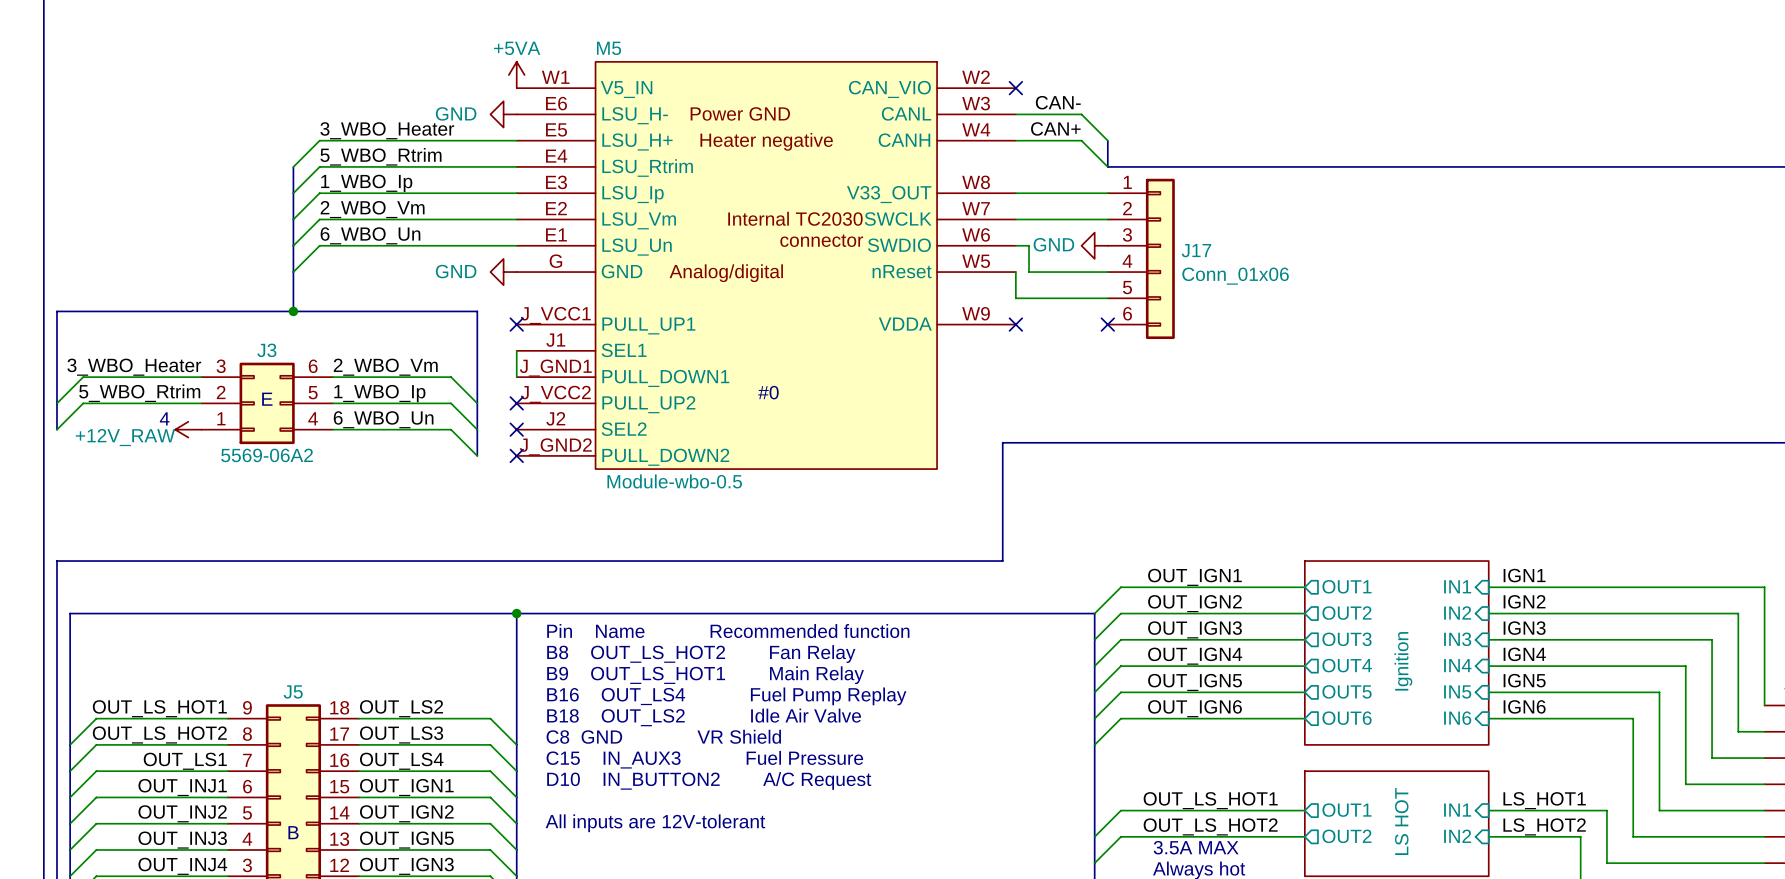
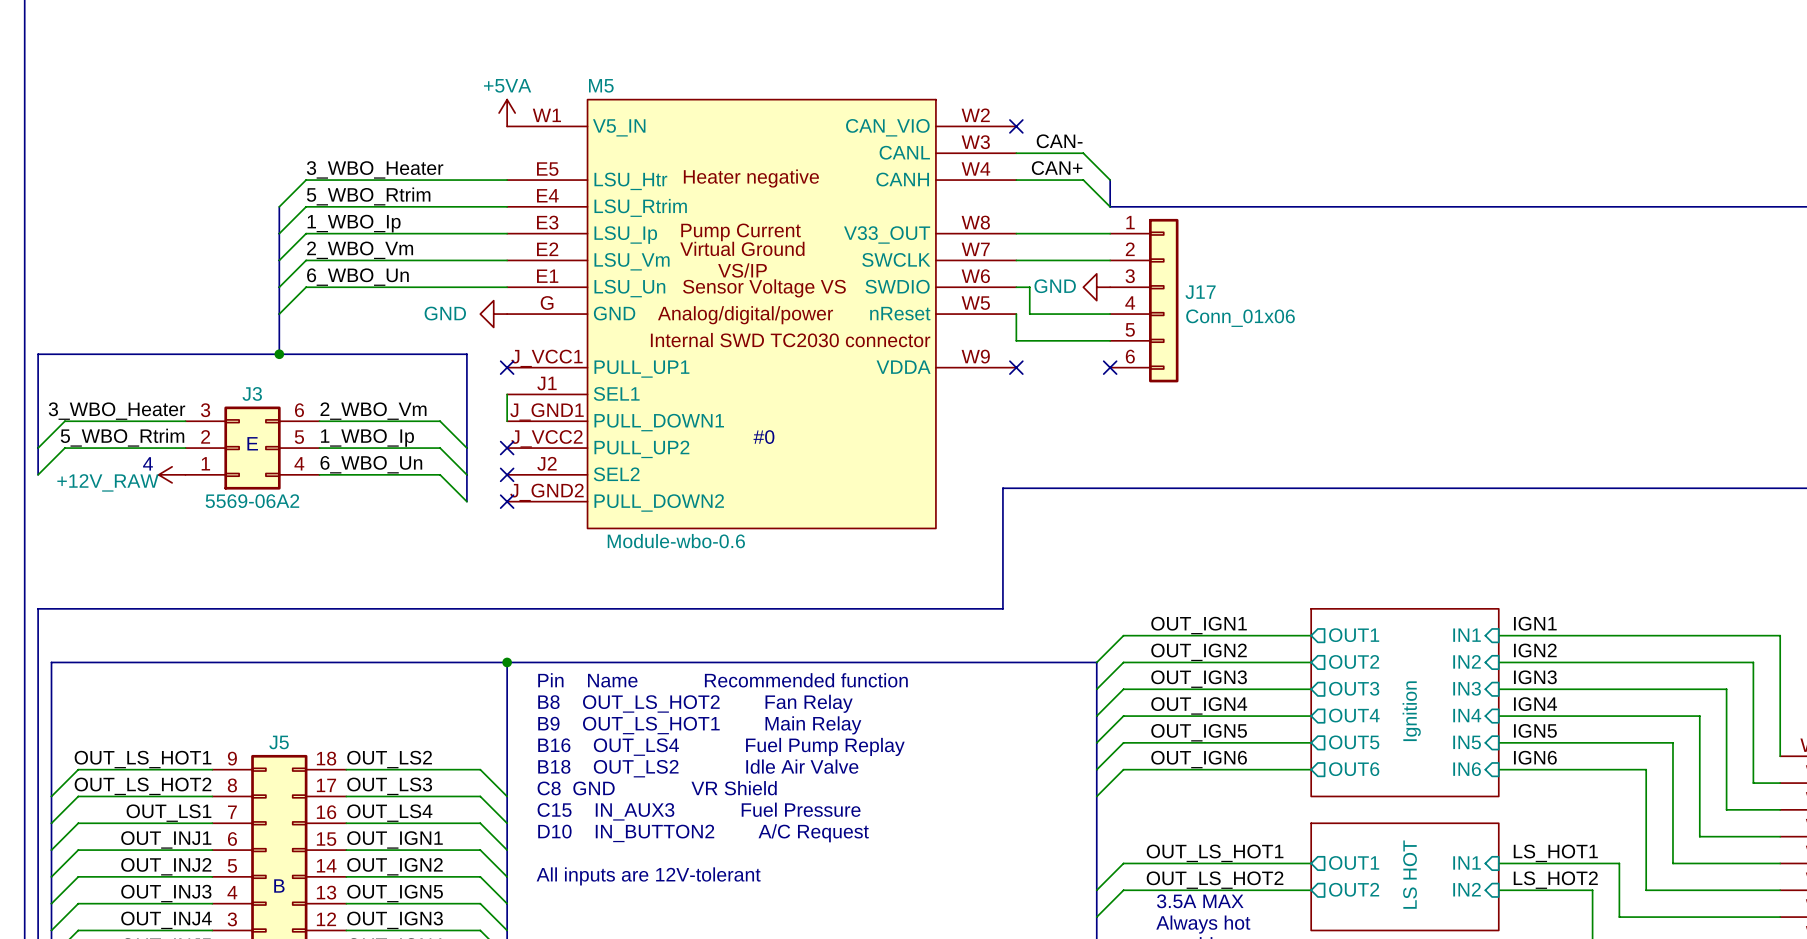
M5 symbol: [516, 61, 1016, 470] -> [507, 99, 1017, 529]
power symbol: GND (503, 114) -> none
M5 value: Module-wbo-0.5 (674, 481) -> Module-wbo-0.6 (676, 541)

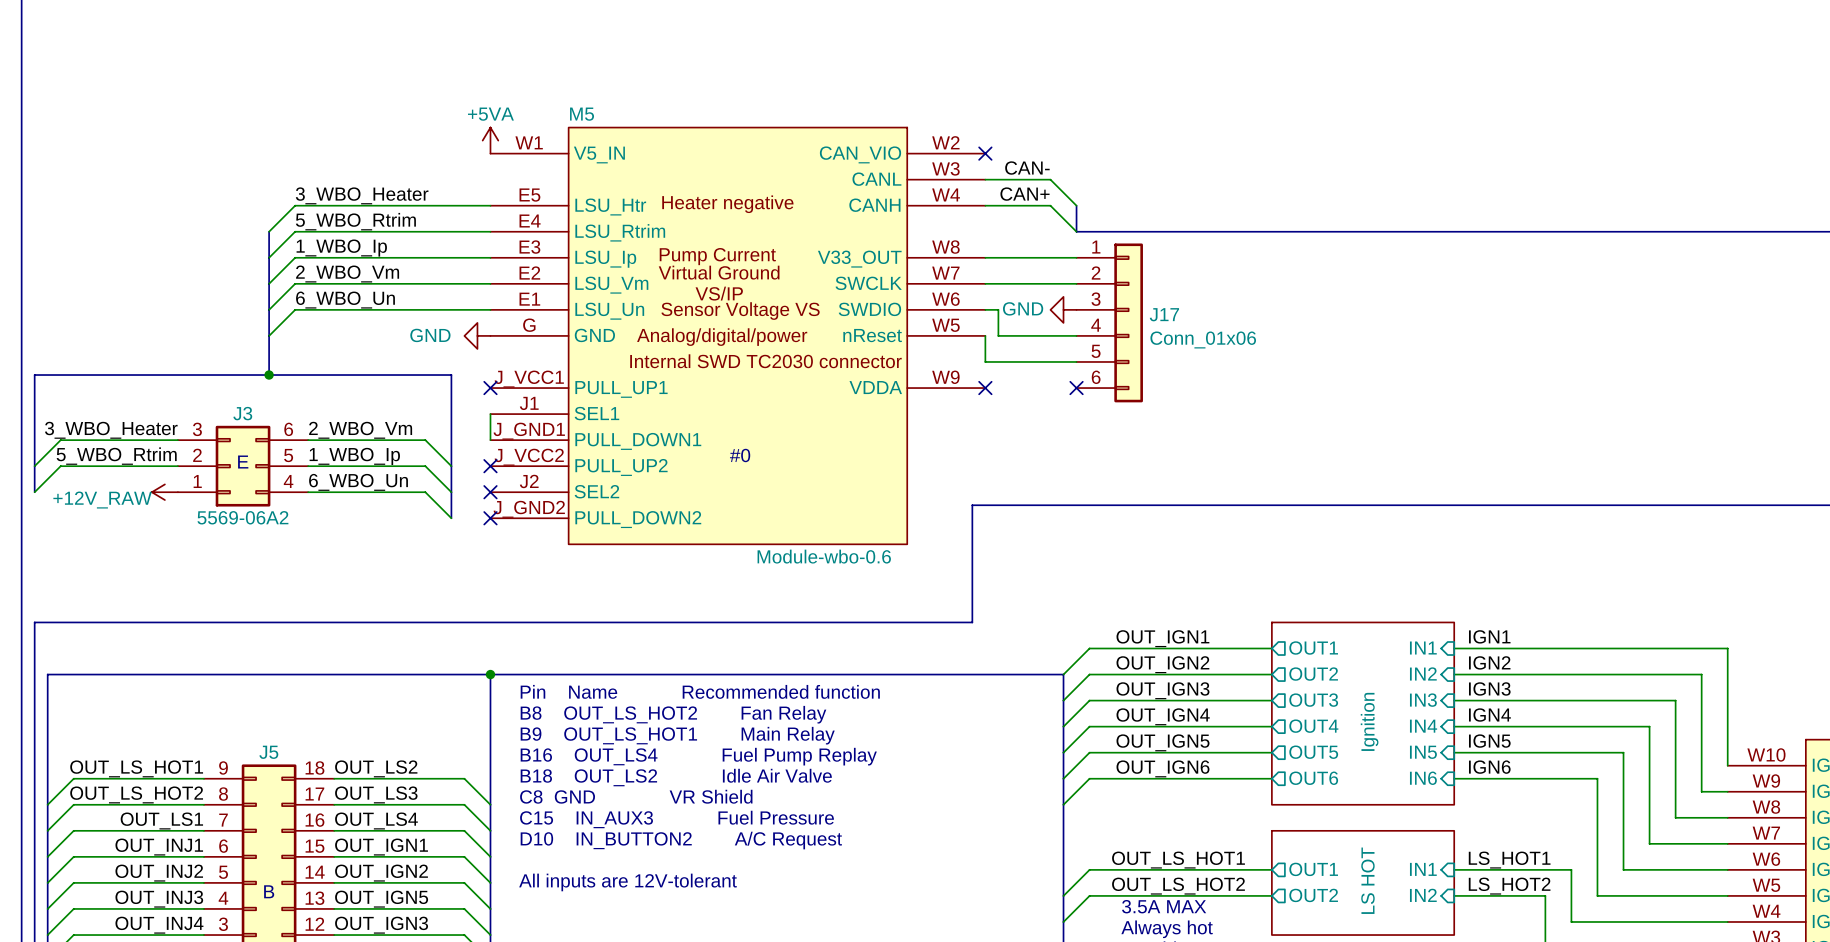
text: 4 (147, 463) -> none
M5 value position: Module-wbo-0.6 (676, 541) -> Module-wbo-0.6 (824, 556)

